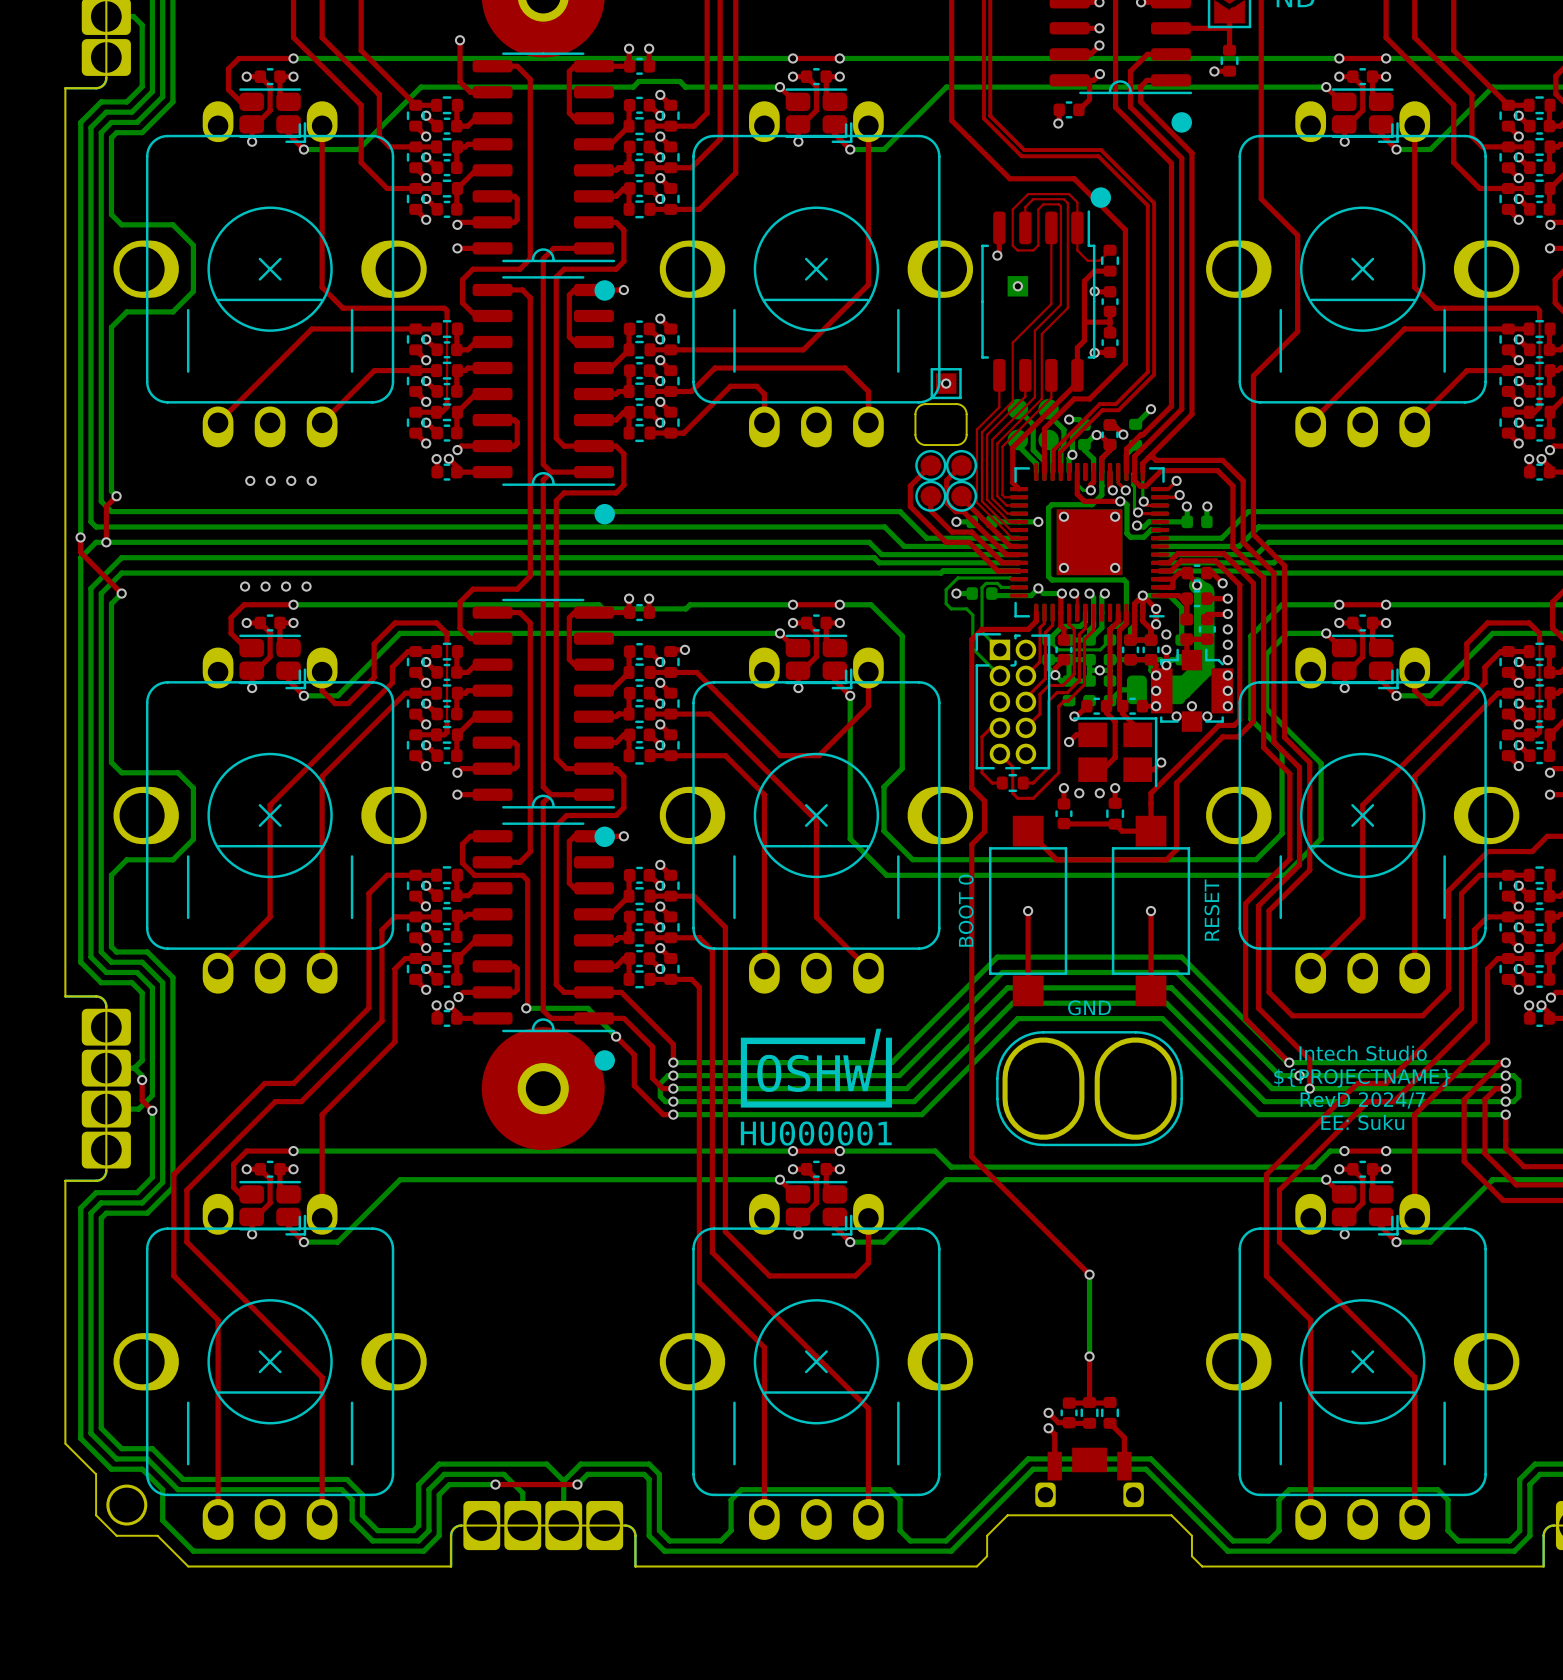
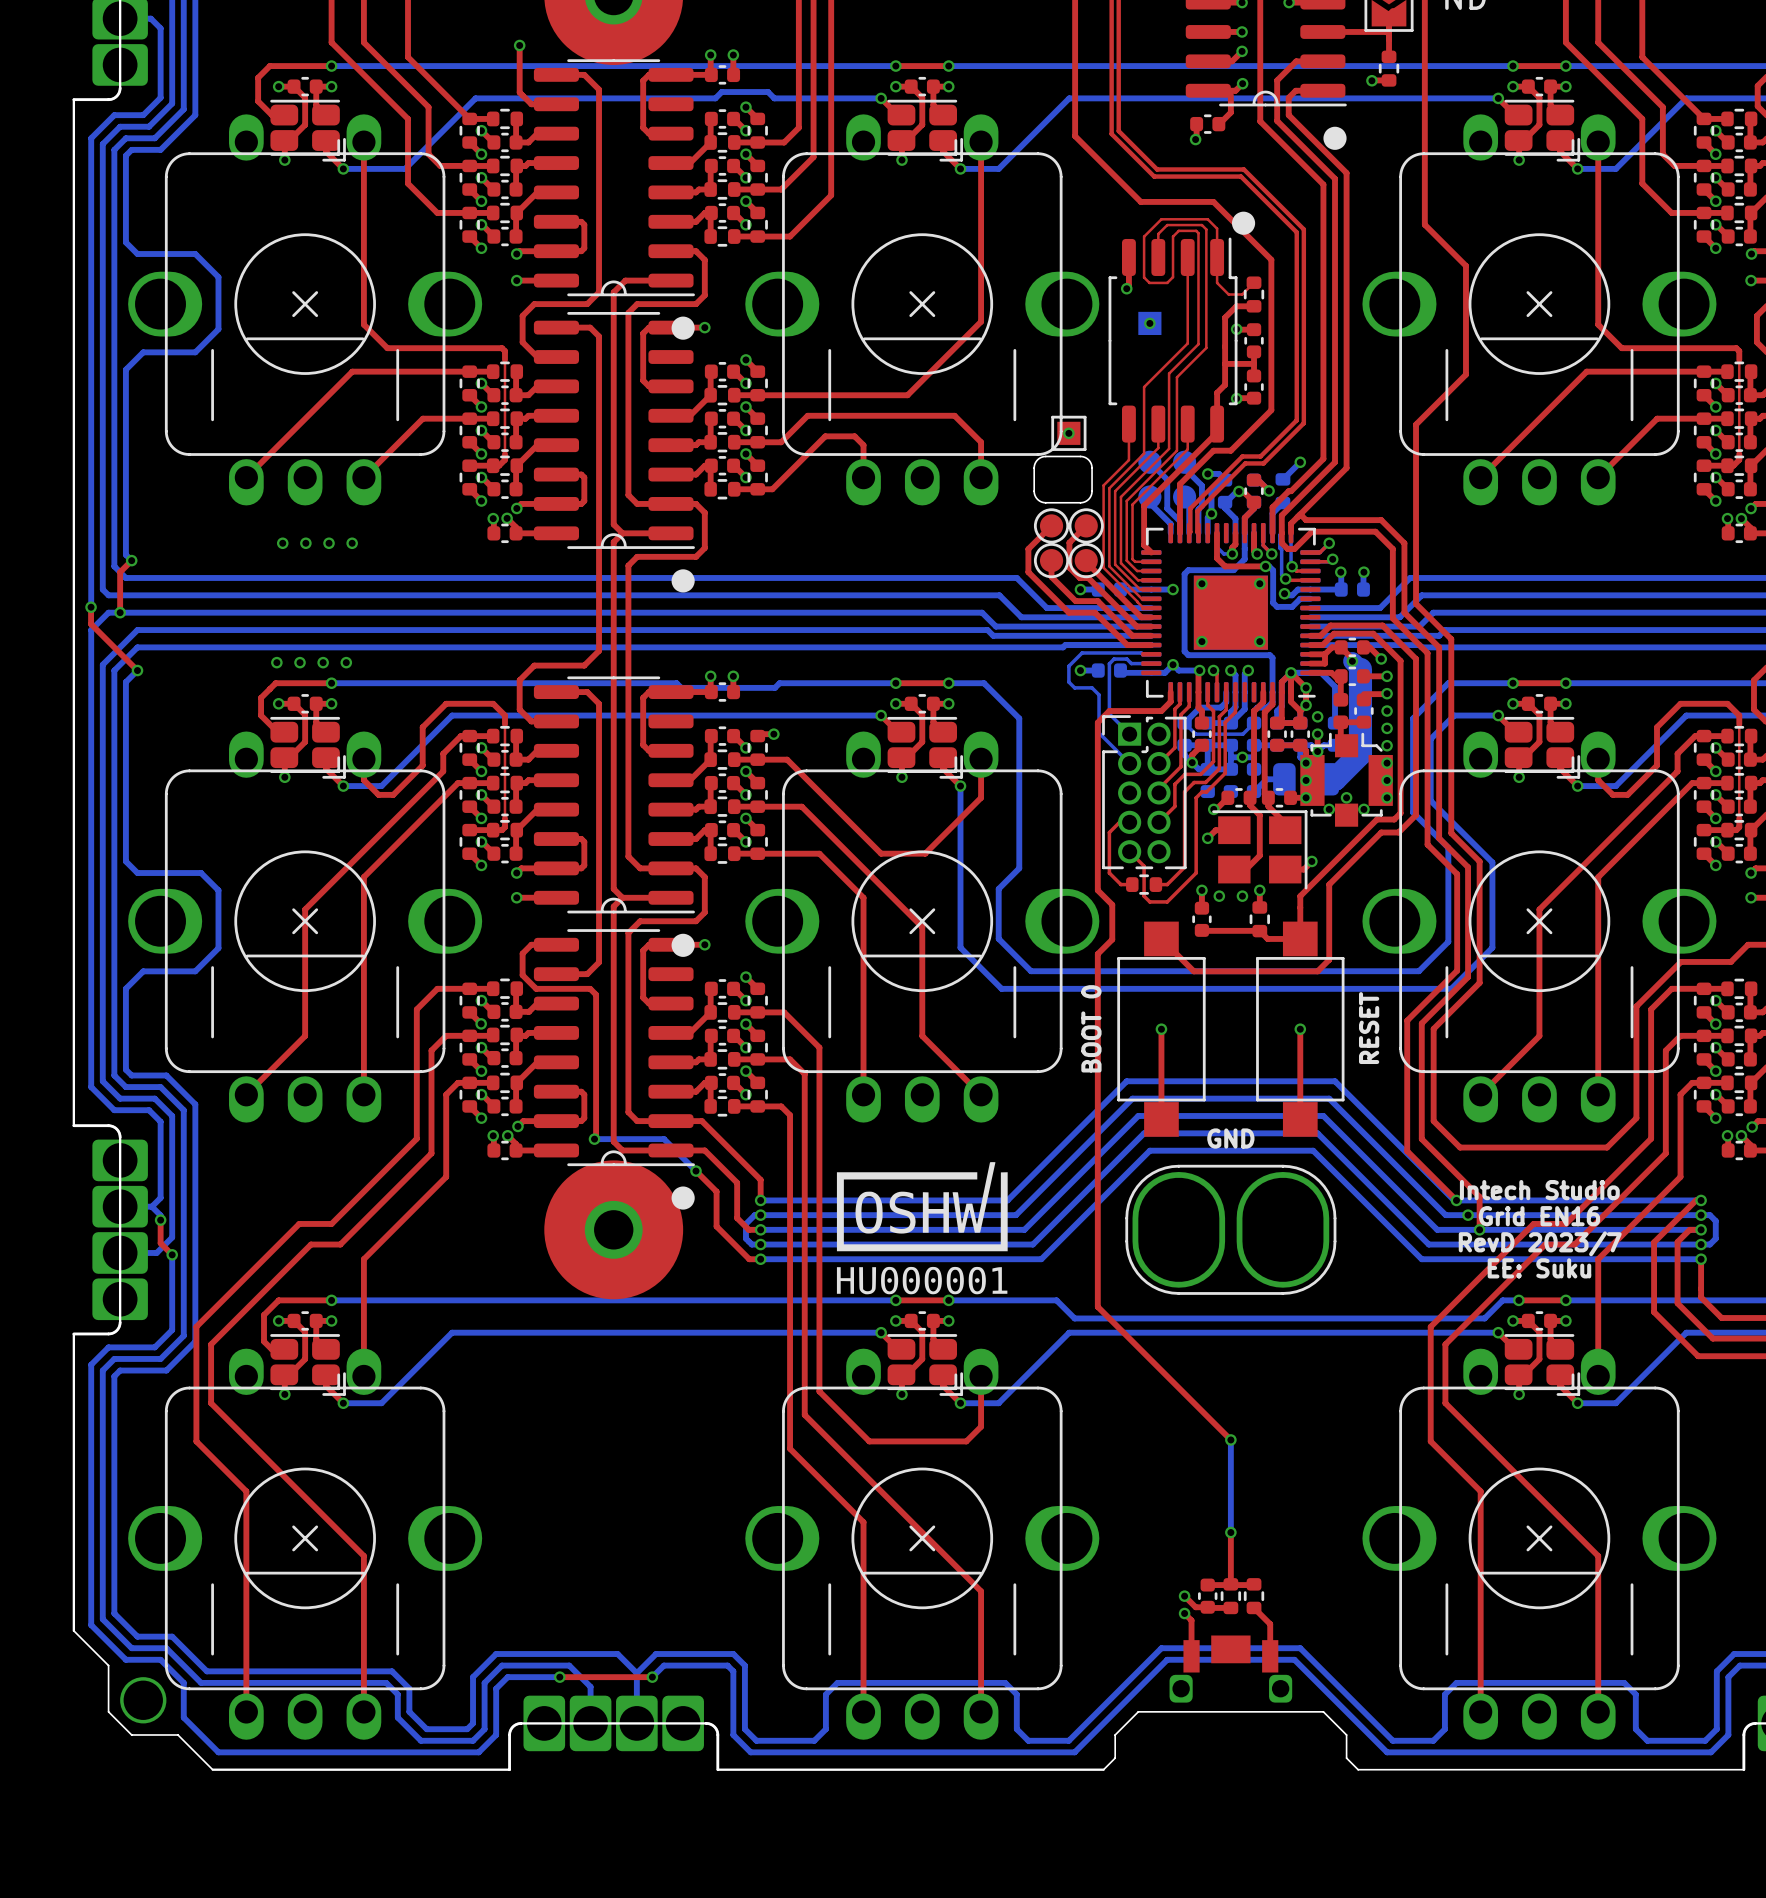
text: ${PROJECTNAME} (1362, 1078) -> Grid EN16 (1539, 1216)
text: RevD 2024/7 (1362, 1100) -> RevD 2023/7 (1540, 1243)

